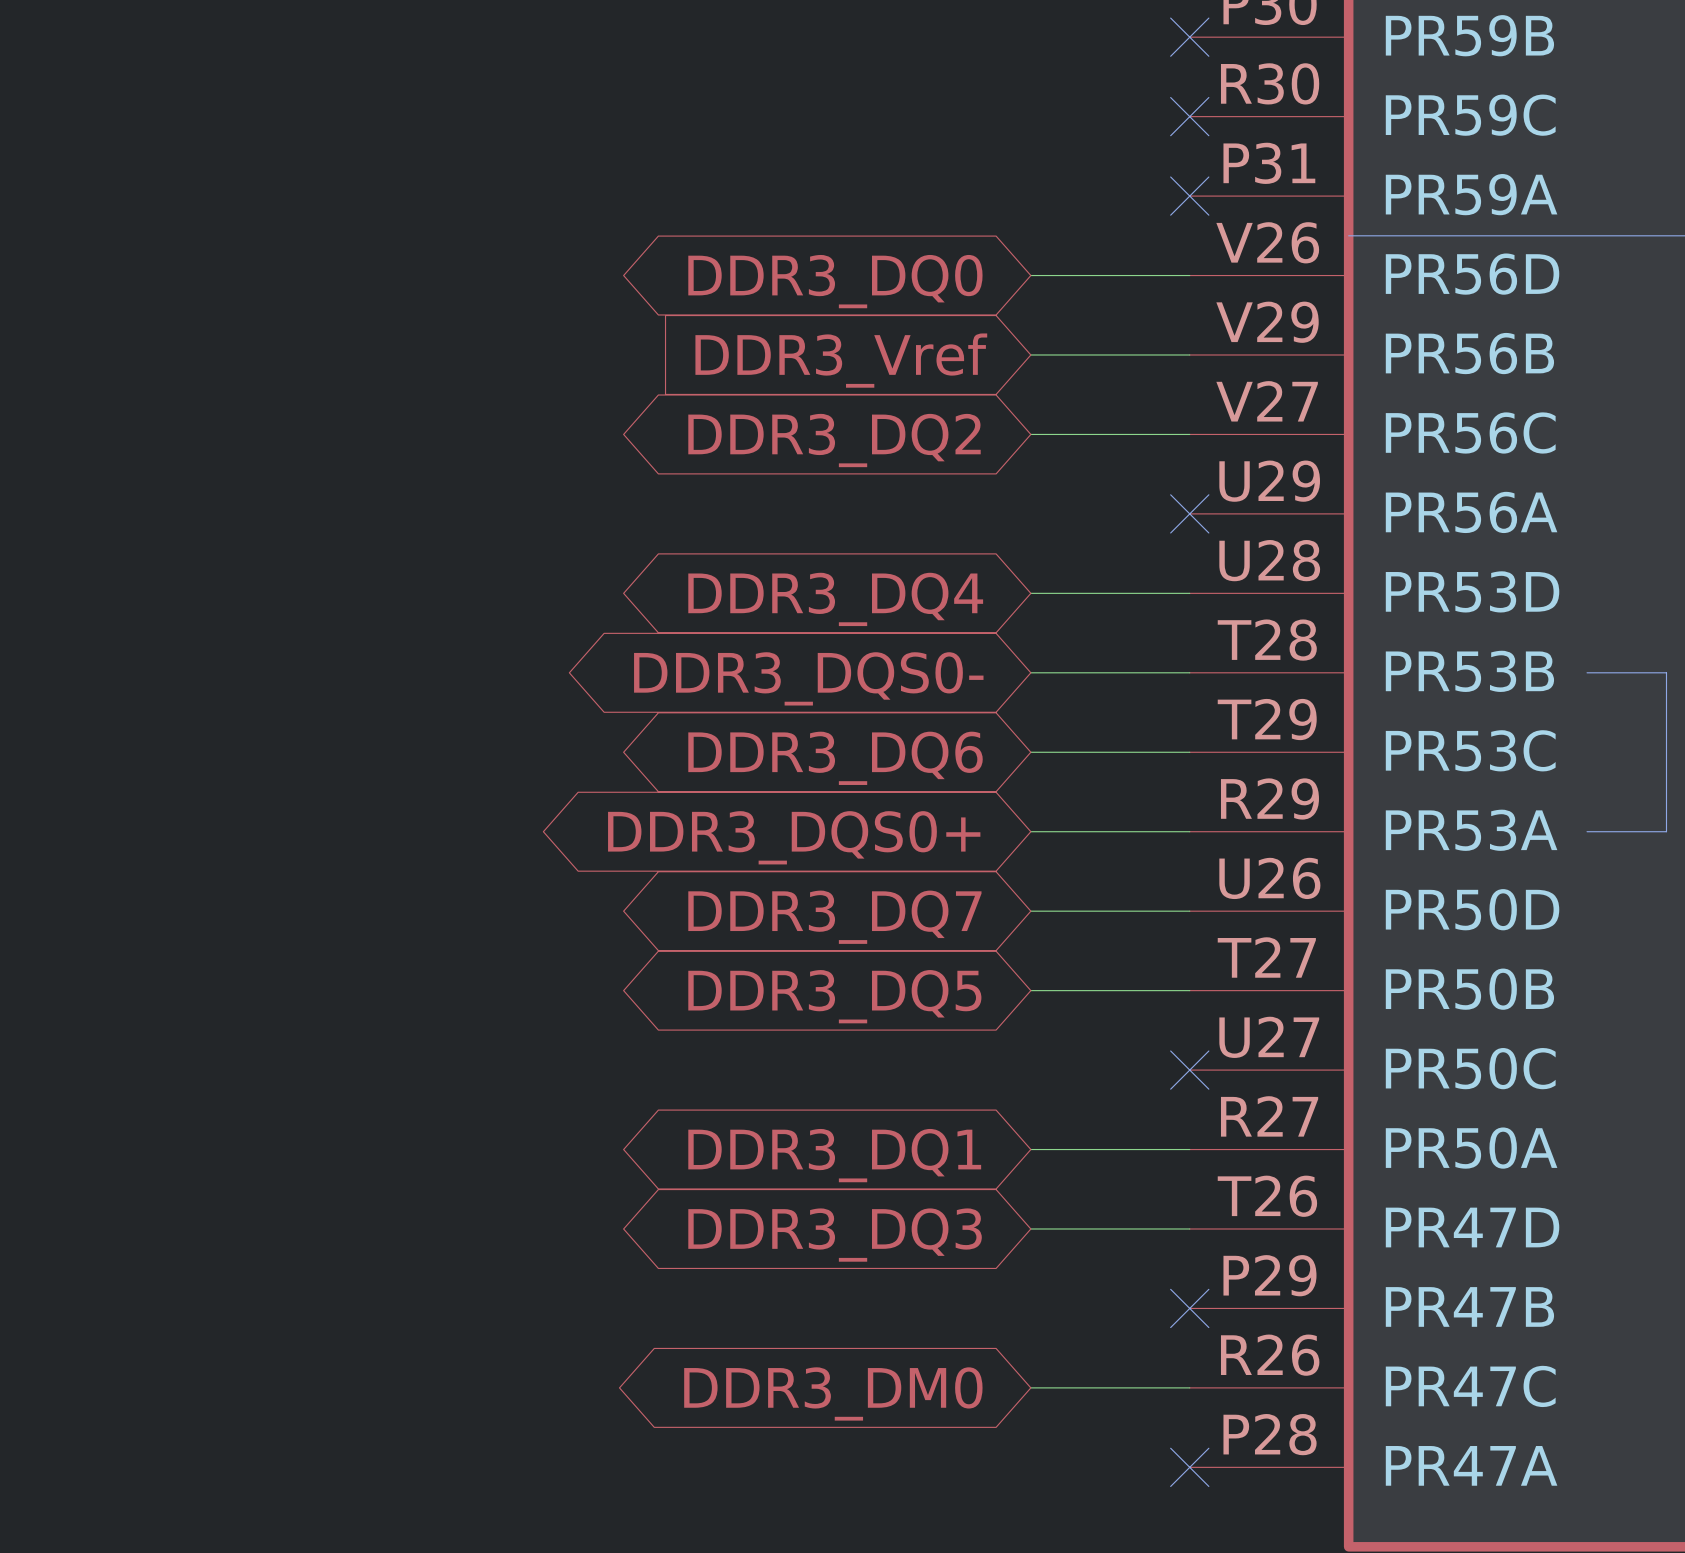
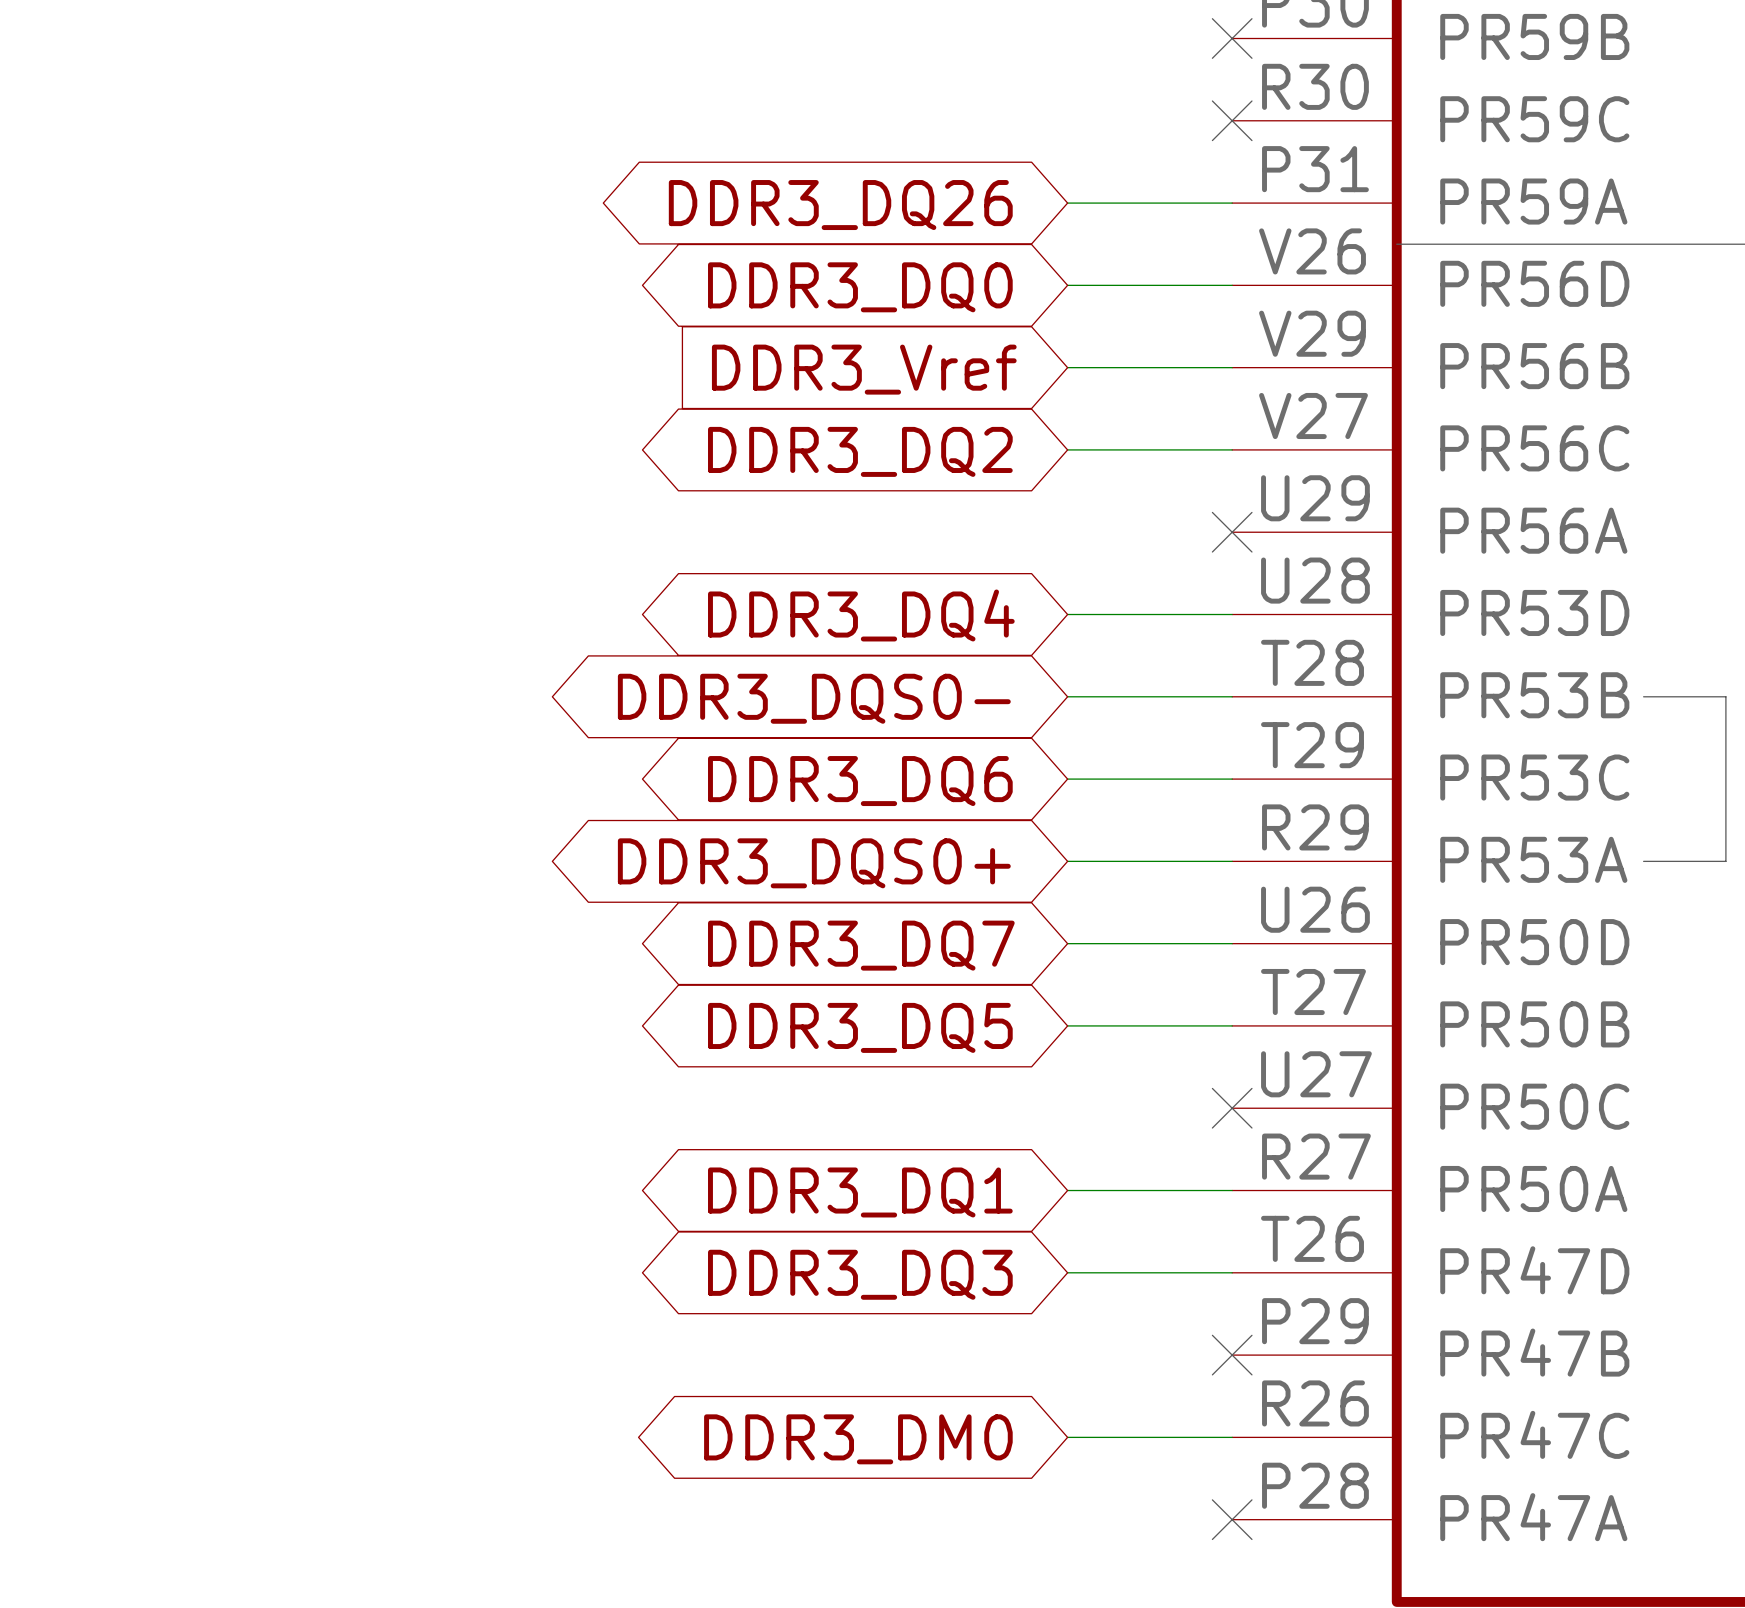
wire: none -> (1067, 203) (1232, 203)
no-connect mark: (1189, 196) -> none
global label: none -> DDR3_DQ26 (840, 205)

